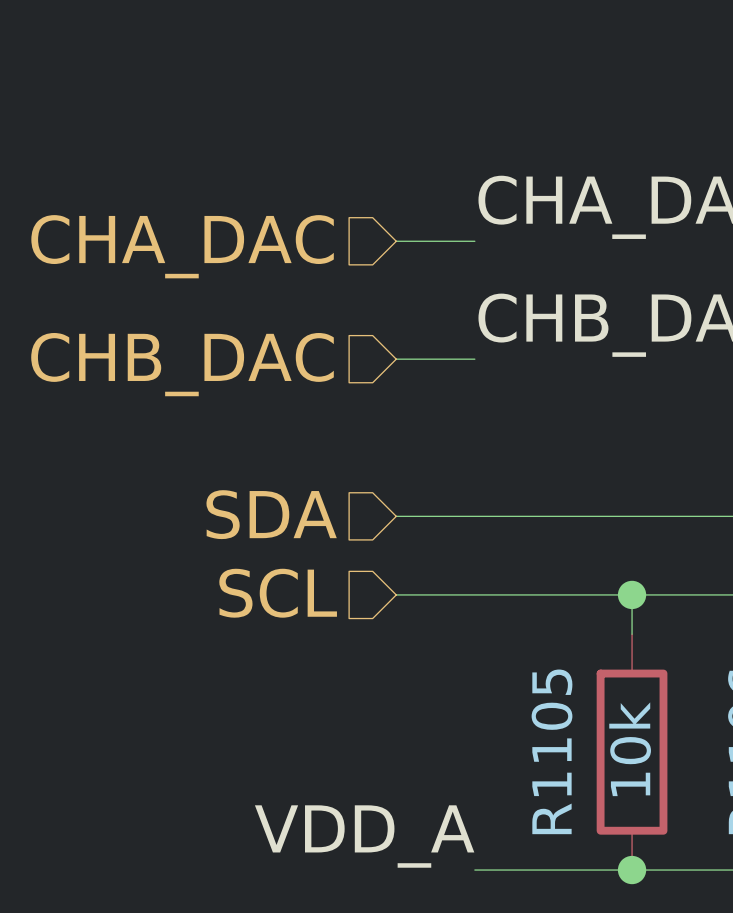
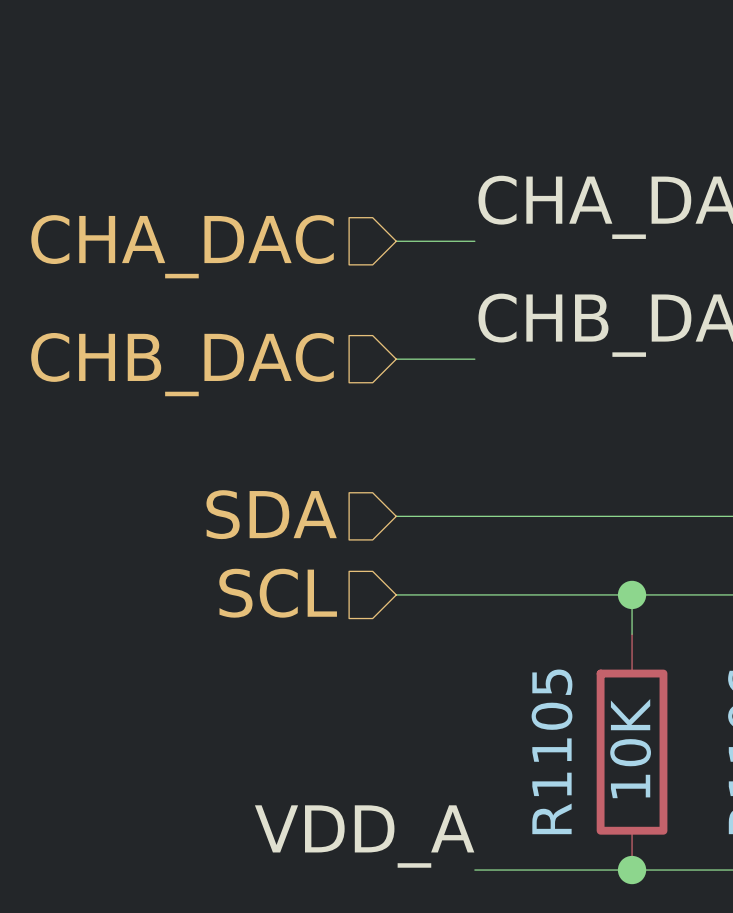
R1105 value: 10k (630, 749) -> 10K (630, 748)

